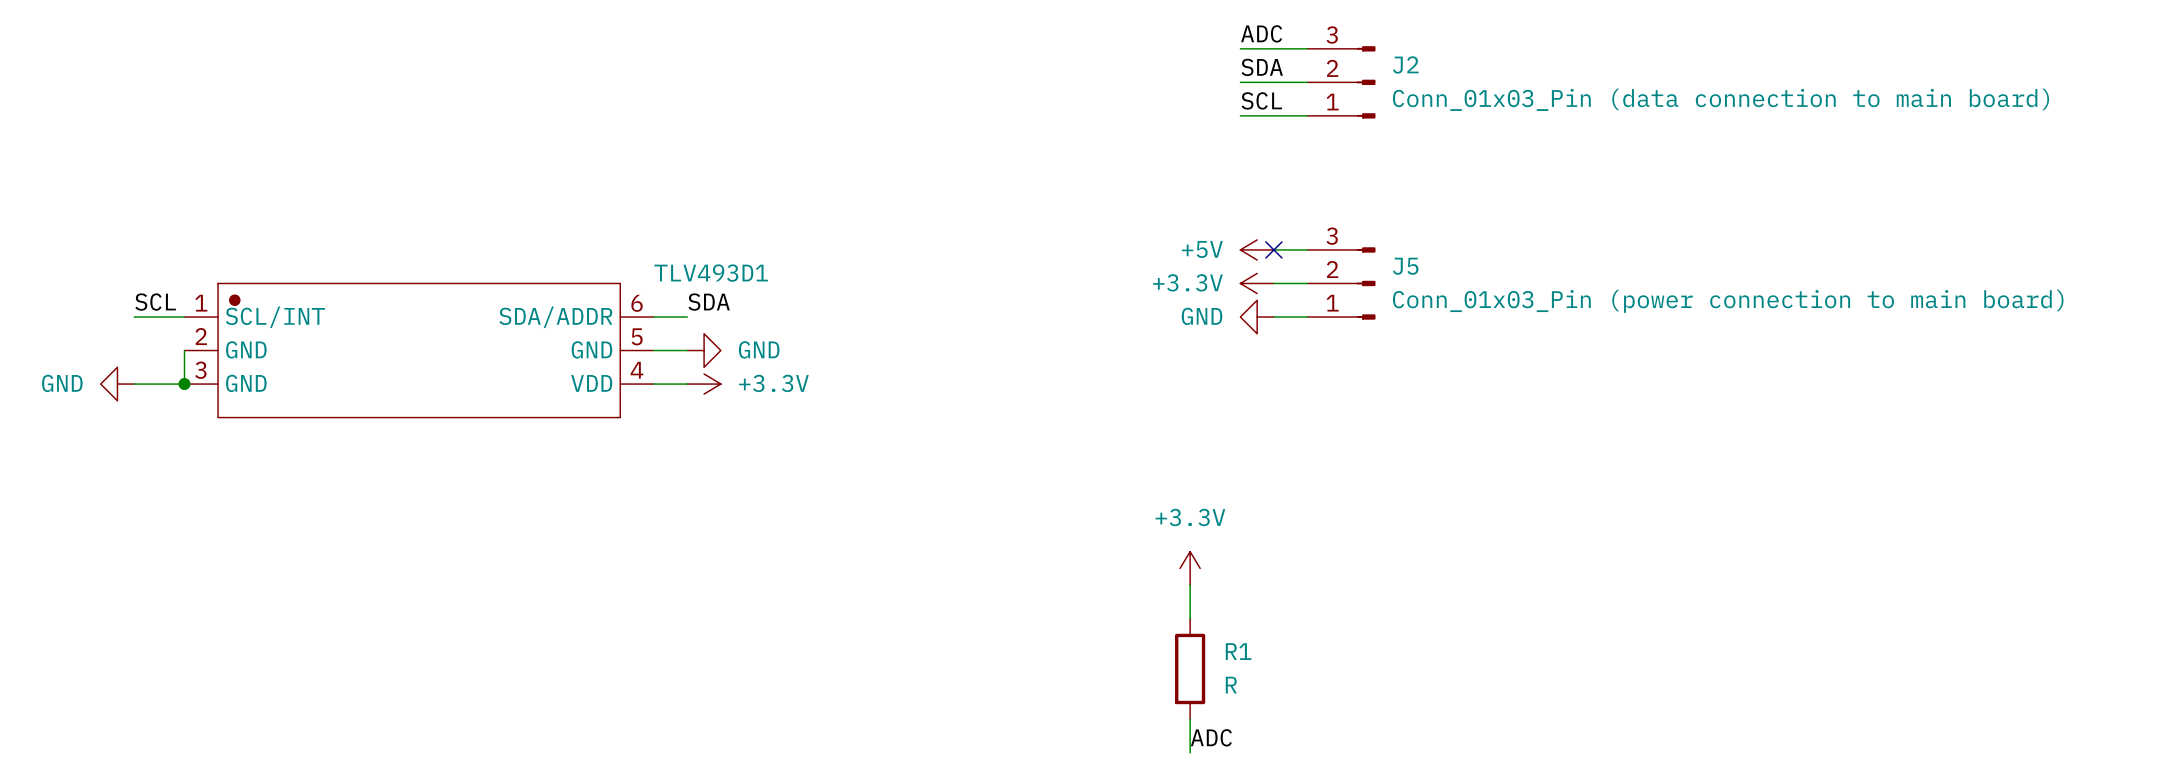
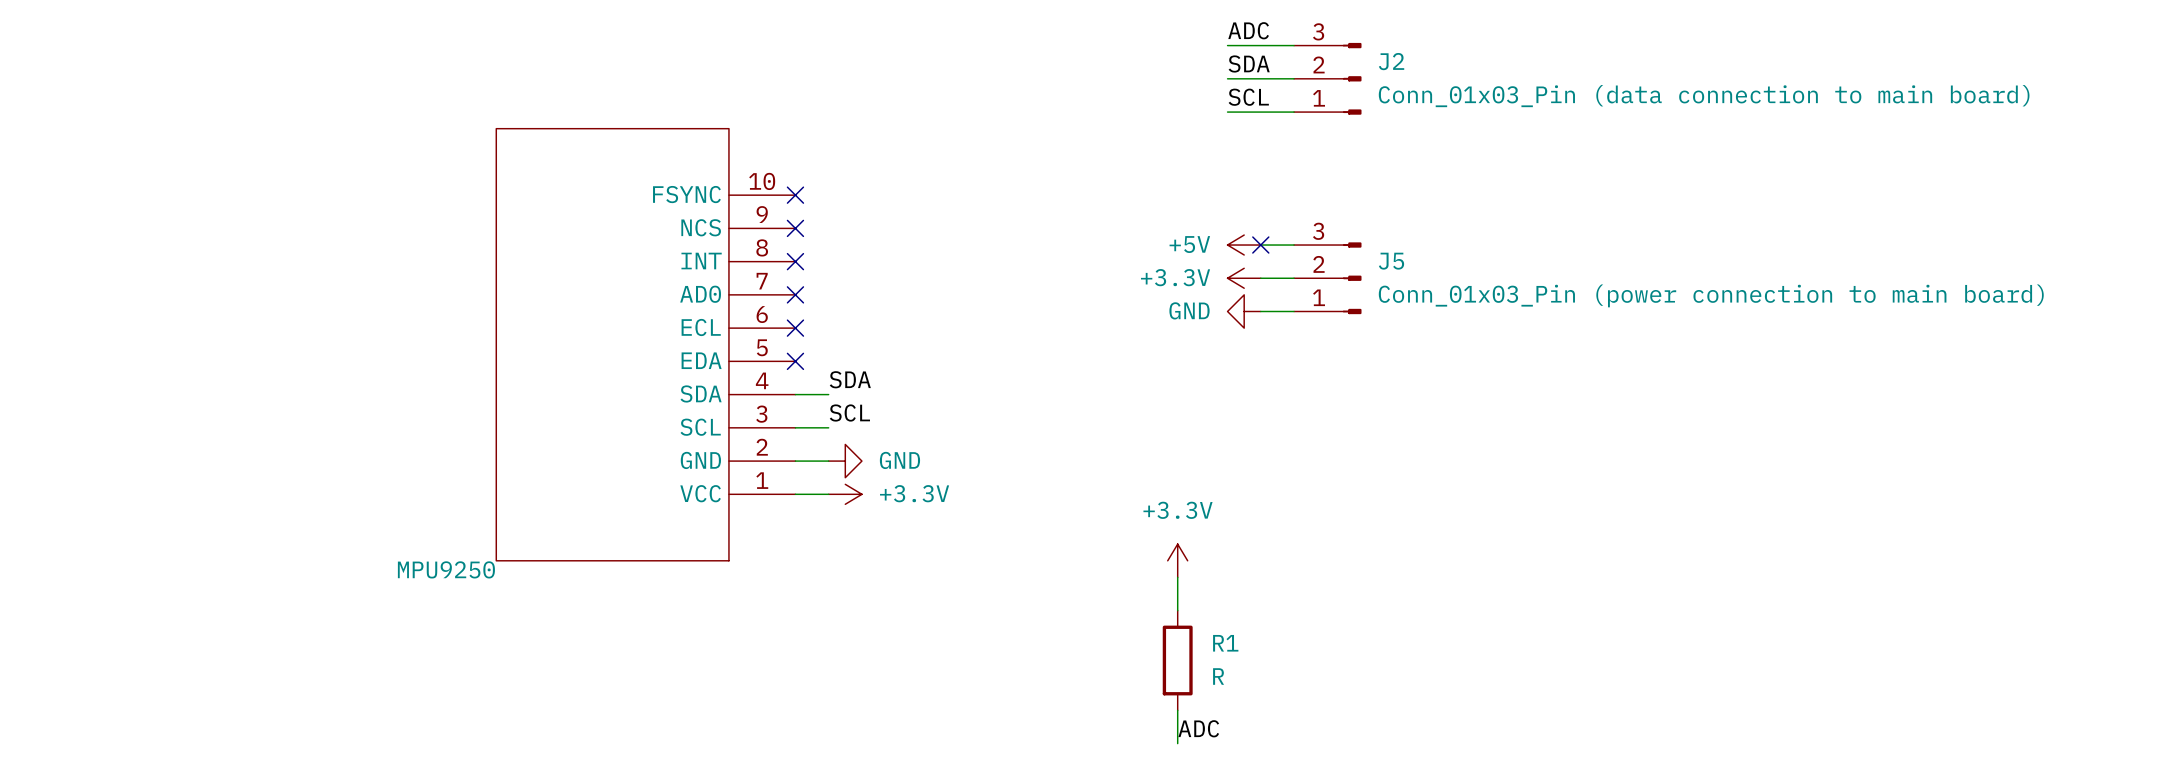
no-connect mark: none -> (795, 195)
no-connect mark: none -> (795, 228)
no-connect mark: none -> (795, 261)
no-connect mark: none -> (795, 294)
label: SCL (155, 302) -> none
label position: SDA (709, 302) -> SDA (850, 379)
wire: (134, 317) (184, 317) -> none
wire: (653, 317) (687, 317) -> (795, 394) (828, 394)
no-connect mark: none -> (795, 328)
wire: (184, 350) (184, 384) (134, 384) -> none
TLV493D1: (419, 350) -> none
wire: (653, 350) (687, 350) -> (795, 427) (828, 427)
MPU9250: none -> (645, 344)
power symbol position: GND (704, 350) -> GND (845, 461)
no-connect mark: none -> (795, 361)
power symbol: GND (117, 384) -> none
junction: (184, 384) -> none
wire: (653, 384) (687, 384) -> (795, 461) (828, 461)
power symbol position: +3.3V (704, 384) -> +3.3V (845, 494)
label: none -> SCL (849, 413)
wire: none -> (795, 494) (828, 494)

